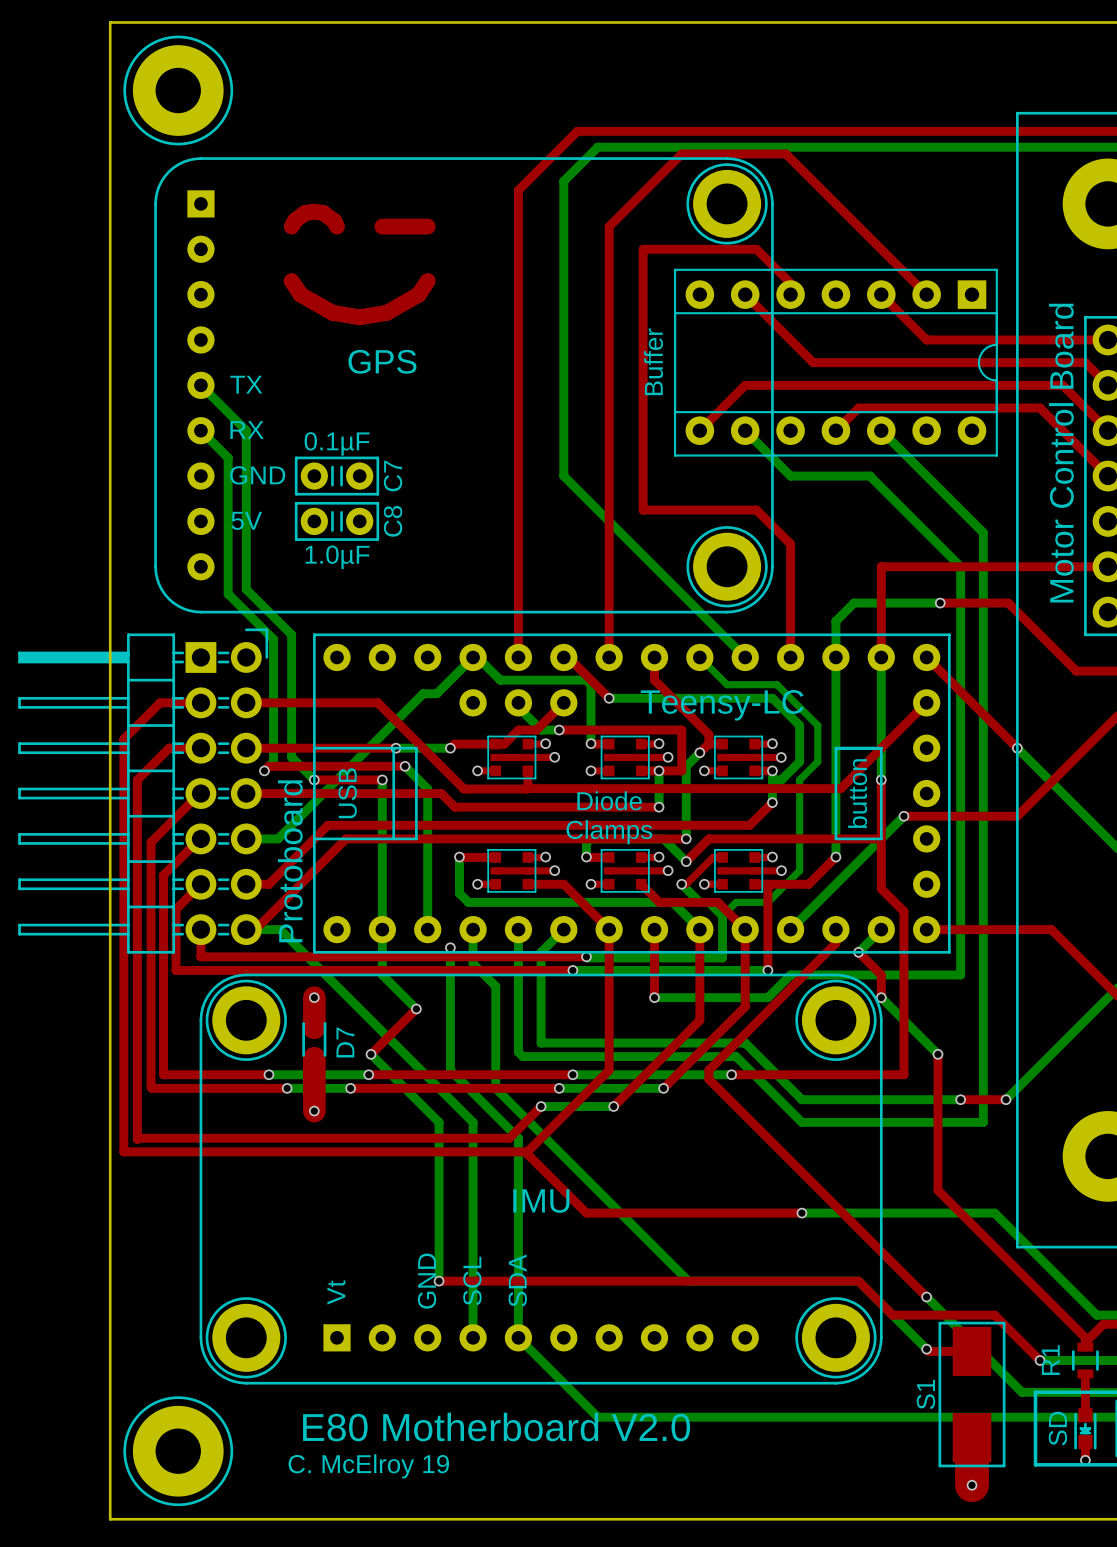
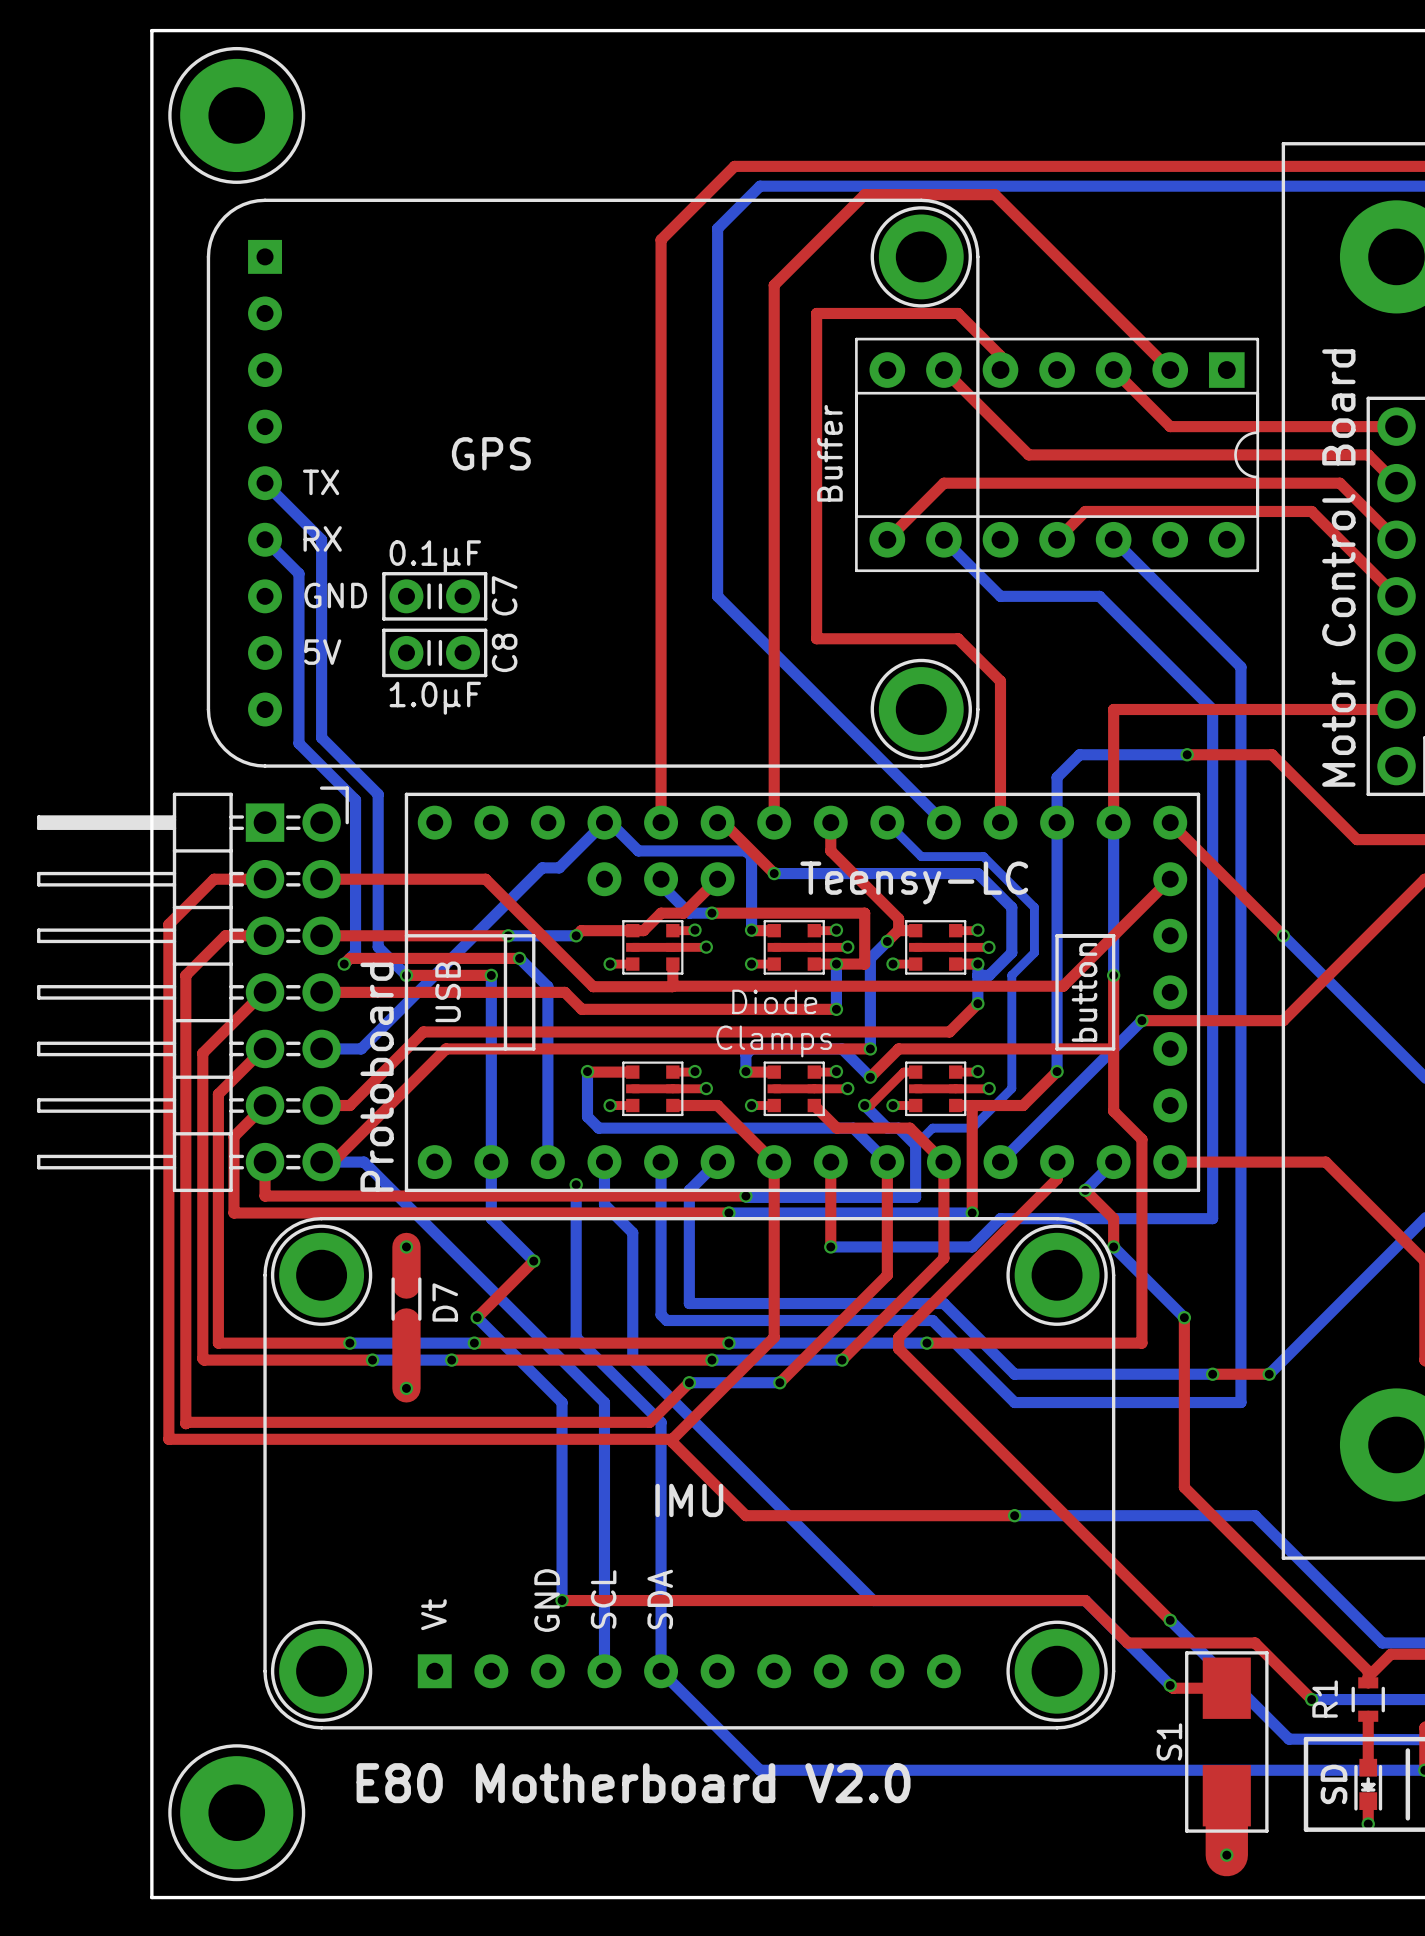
top track: (291, 226) (295, 220) (305, 212) (314, 211) (323, 212) (334, 221) (337, 226) -> none
top track: (382, 226) (427, 226) -> none
top track: (291, 281) (300, 294) (332, 312) (359, 317) (386, 312) (418, 294) (427, 281) -> none
text: C. McElroy 19 (368, 1466) -> none

